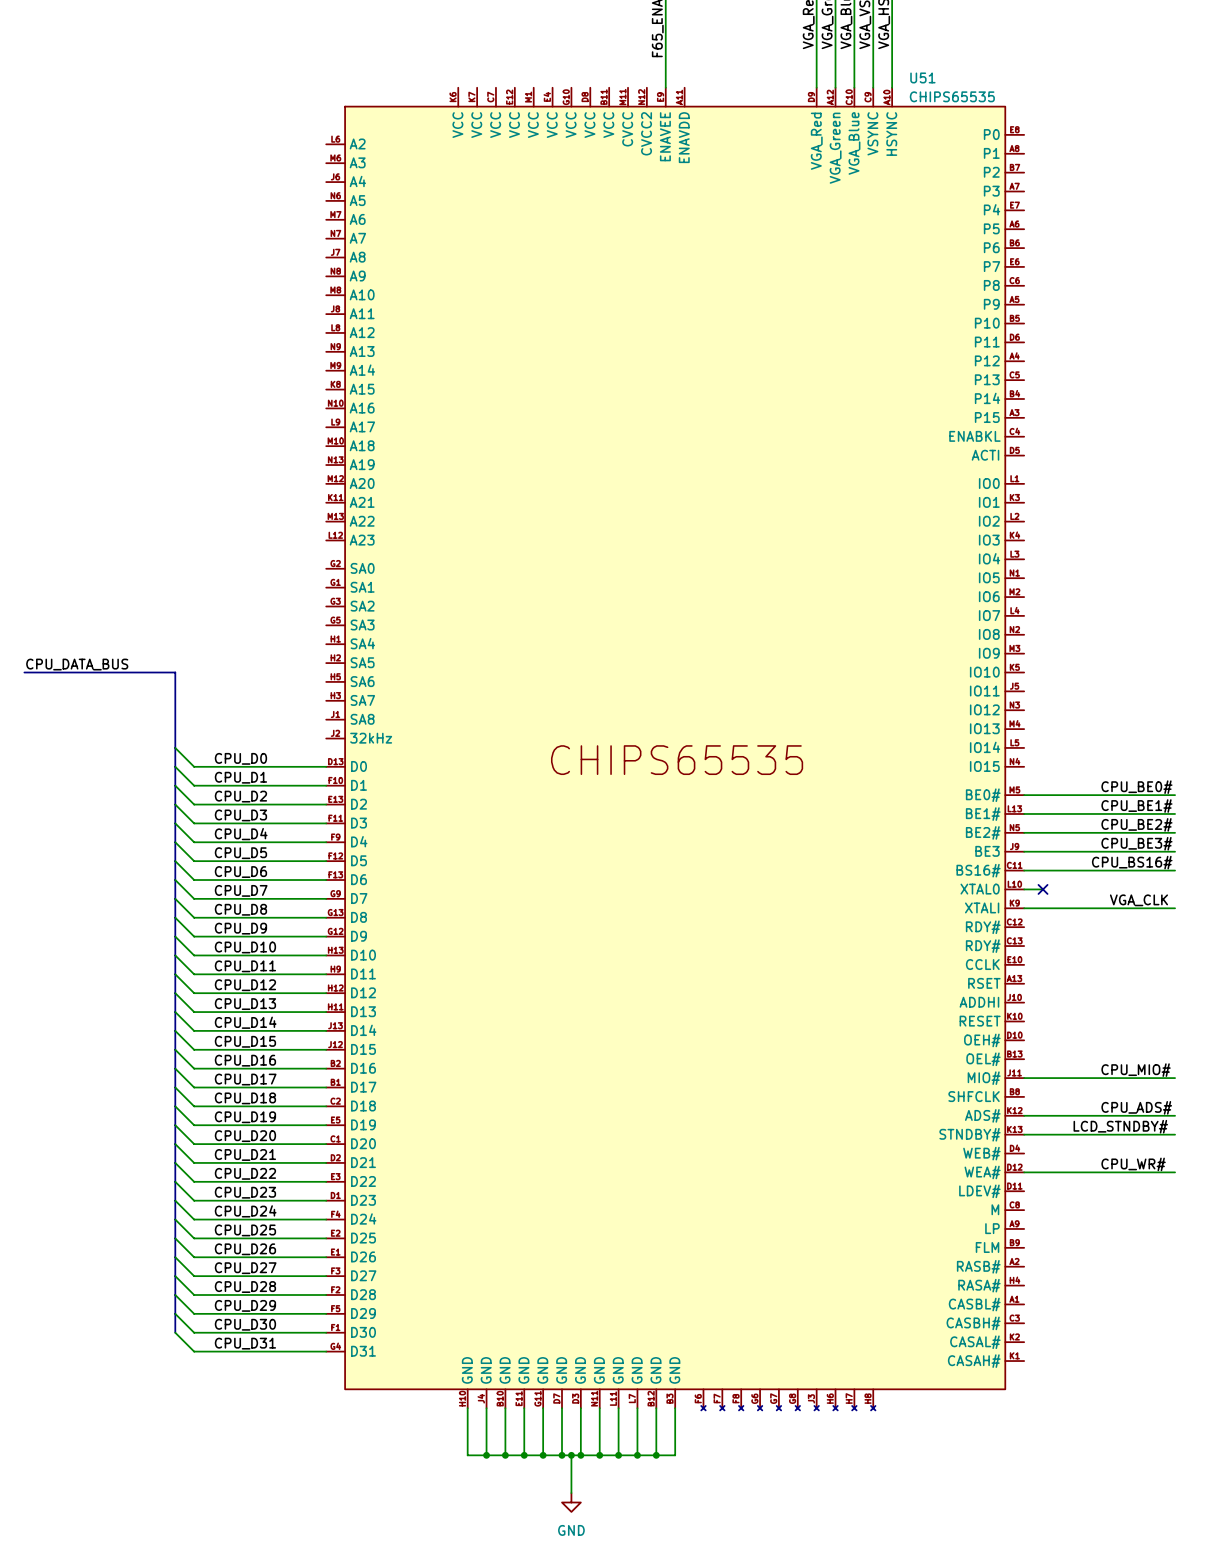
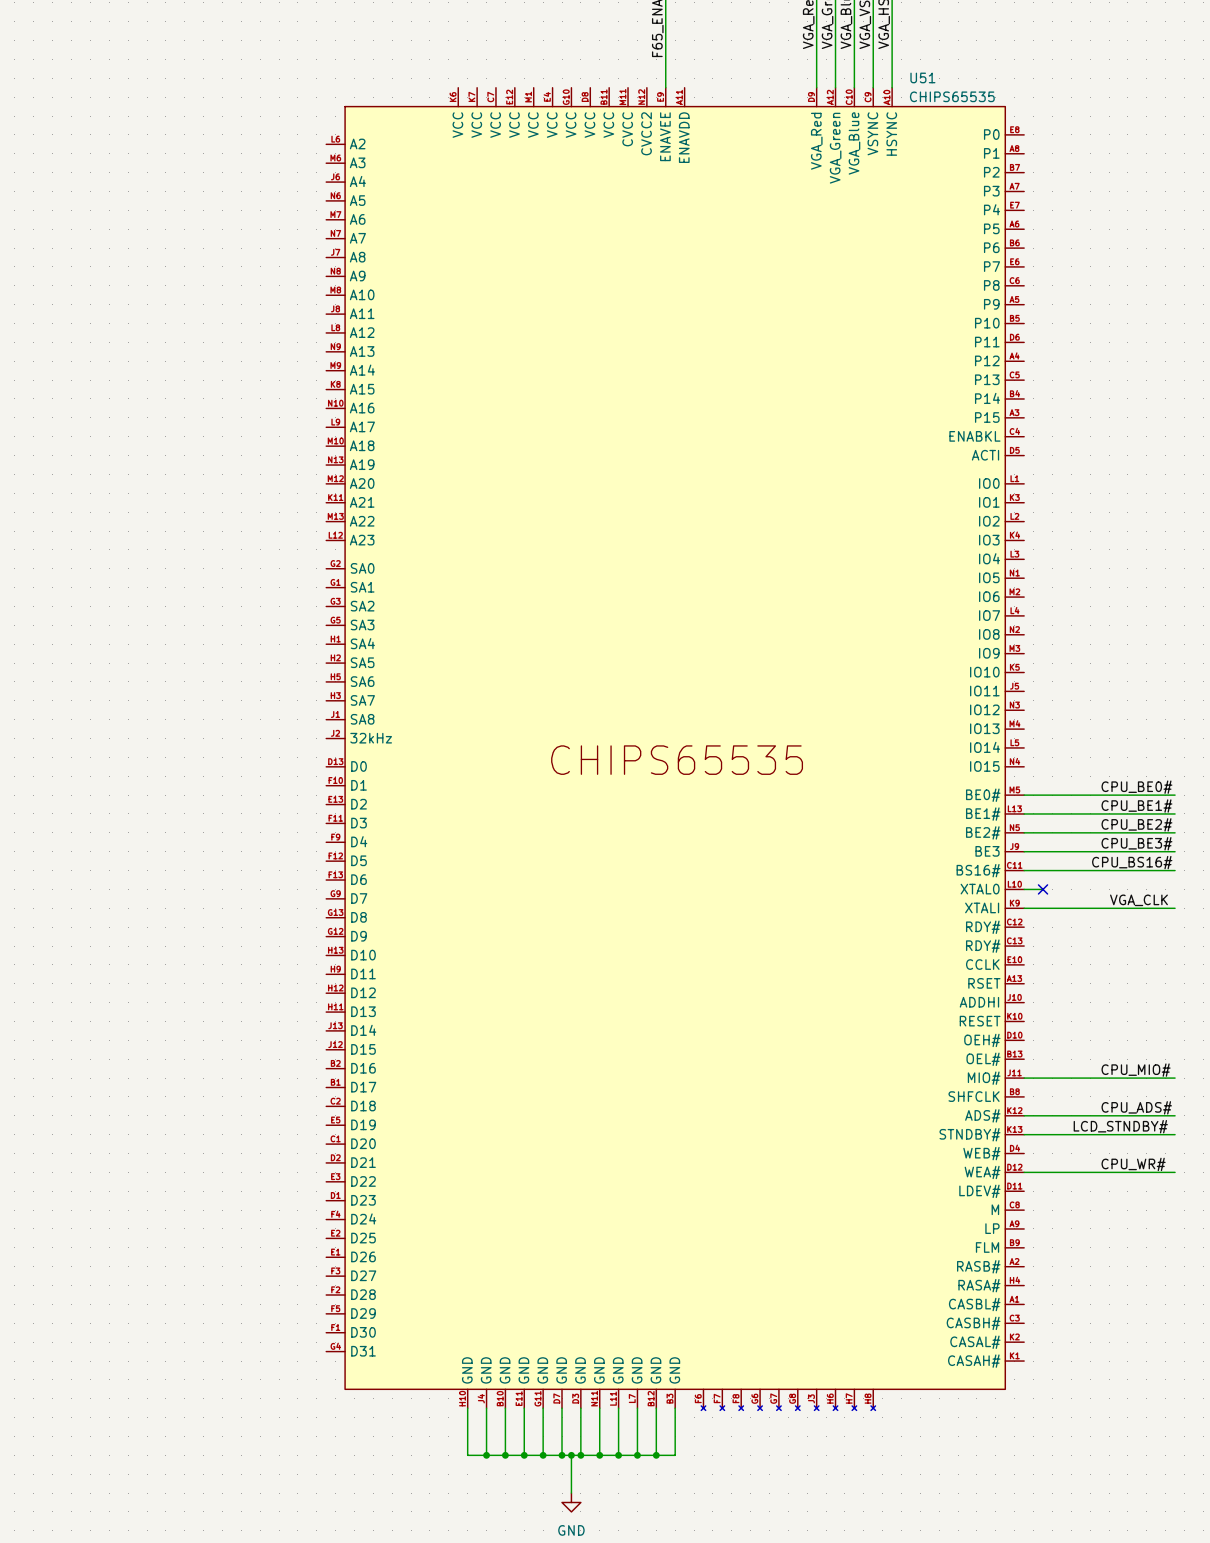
label: CPU_DATA_BUS (77, 664) -> none
bus: (24, 672) (175, 672) (175, 1332) -> none
wire: (175, 747) (194, 766) (326, 766) -> none
label: CPU_D0 (240, 758) -> none
wire: (175, 766) (194, 785) (326, 785) -> none
label: CPU_D1 (240, 777) -> none
wire: (175, 785) (194, 804) (326, 804) -> none
label: CPU_D2 (240, 796) -> none
wire: (175, 804) (194, 823) (326, 823) -> none
label: CPU_D3 (240, 815) -> none
wire: (175, 823) (194, 842) (326, 842) -> none
label: CPU_D4 (241, 834) -> none
wire: (175, 842) (194, 861) (326, 861) -> none
label: CPU_D5 (240, 853) -> none
wire: (175, 861) (194, 880) (326, 880) -> none
label: CPU_D6 (240, 872) -> none
wire: (175, 880) (194, 898) (326, 898) -> none
label: CPU_D7 (241, 890) -> none
wire: (175, 898) (194, 917) (326, 917) -> none
label: CPU_D8 (240, 909) -> none
wire: (175, 917) (194, 936) (326, 936) -> none
label: CPU_D9 (240, 928) -> none
wire: (175, 936) (194, 955) (326, 955) -> none
label: CPU_D10 (245, 947) -> none
wire: (175, 955) (194, 974) (326, 974) -> none
label: CPU_D11 (245, 966) -> none
wire: (175, 974) (194, 993) (326, 993) -> none
label: CPU_D12 (245, 985) -> none
wire: (175, 993) (194, 1012) (326, 1012) -> none
label: CPU_D13 (245, 1004) -> none
wire: (175, 1012) (194, 1030) (326, 1030) -> none
label: CPU_D14 (245, 1022) -> none
wire: (175, 1030) (194, 1049) (326, 1049) -> none
label: CPU_D15 (245, 1041) -> none
wire: (175, 1049) (194, 1068) (326, 1068) -> none
label: CPU_D16 (245, 1060) -> none
wire: (175, 1068) (194, 1087) (326, 1087) -> none
label: CPU_D17 (245, 1079) -> none
wire: (175, 1087) (194, 1106) (326, 1106) -> none
label: CPU_D18 (245, 1098) -> none
wire: (175, 1106) (194, 1125) (326, 1125) -> none
label: CPU_D19 (245, 1117) -> none
wire: (175, 1125) (194, 1144) (326, 1144) -> none
label: CPU_D20 (245, 1136) -> none
wire: (175, 1144) (194, 1162) (326, 1162) -> none
label: CPU_D21 (245, 1154) -> none
wire: (175, 1162) (194, 1181) (326, 1181) -> none
label: CPU_D22 (245, 1173) -> none
wire: (175, 1181) (194, 1200) (326, 1200) -> none
label: CPU_D23 (245, 1192) -> none
wire: (175, 1200) (194, 1219) (326, 1219) -> none
label: CPU_D24 (245, 1211) -> none
wire: (175, 1219) (194, 1238) (326, 1238) -> none
label: CPU_D25 (245, 1230) -> none
wire: (175, 1238) (194, 1257) (326, 1257) -> none
label: CPU_D26 (245, 1249) -> none
wire: (175, 1257) (194, 1276) (326, 1276) -> none
label: CPU_D27 (245, 1268) -> none
wire: (175, 1276) (194, 1295) (326, 1295) -> none
label: CPU_D28 (245, 1287) -> none
wire: (175, 1295) (194, 1313) (326, 1313) -> none
label: CPU_D29 (245, 1305) -> none
wire: (175, 1313) (194, 1332) (326, 1332) -> none
label: CPU_D30 (245, 1324) -> none
wire: (175, 1332) (194, 1351) (326, 1351) -> none
label: CPU_D31 (245, 1343) -> none

